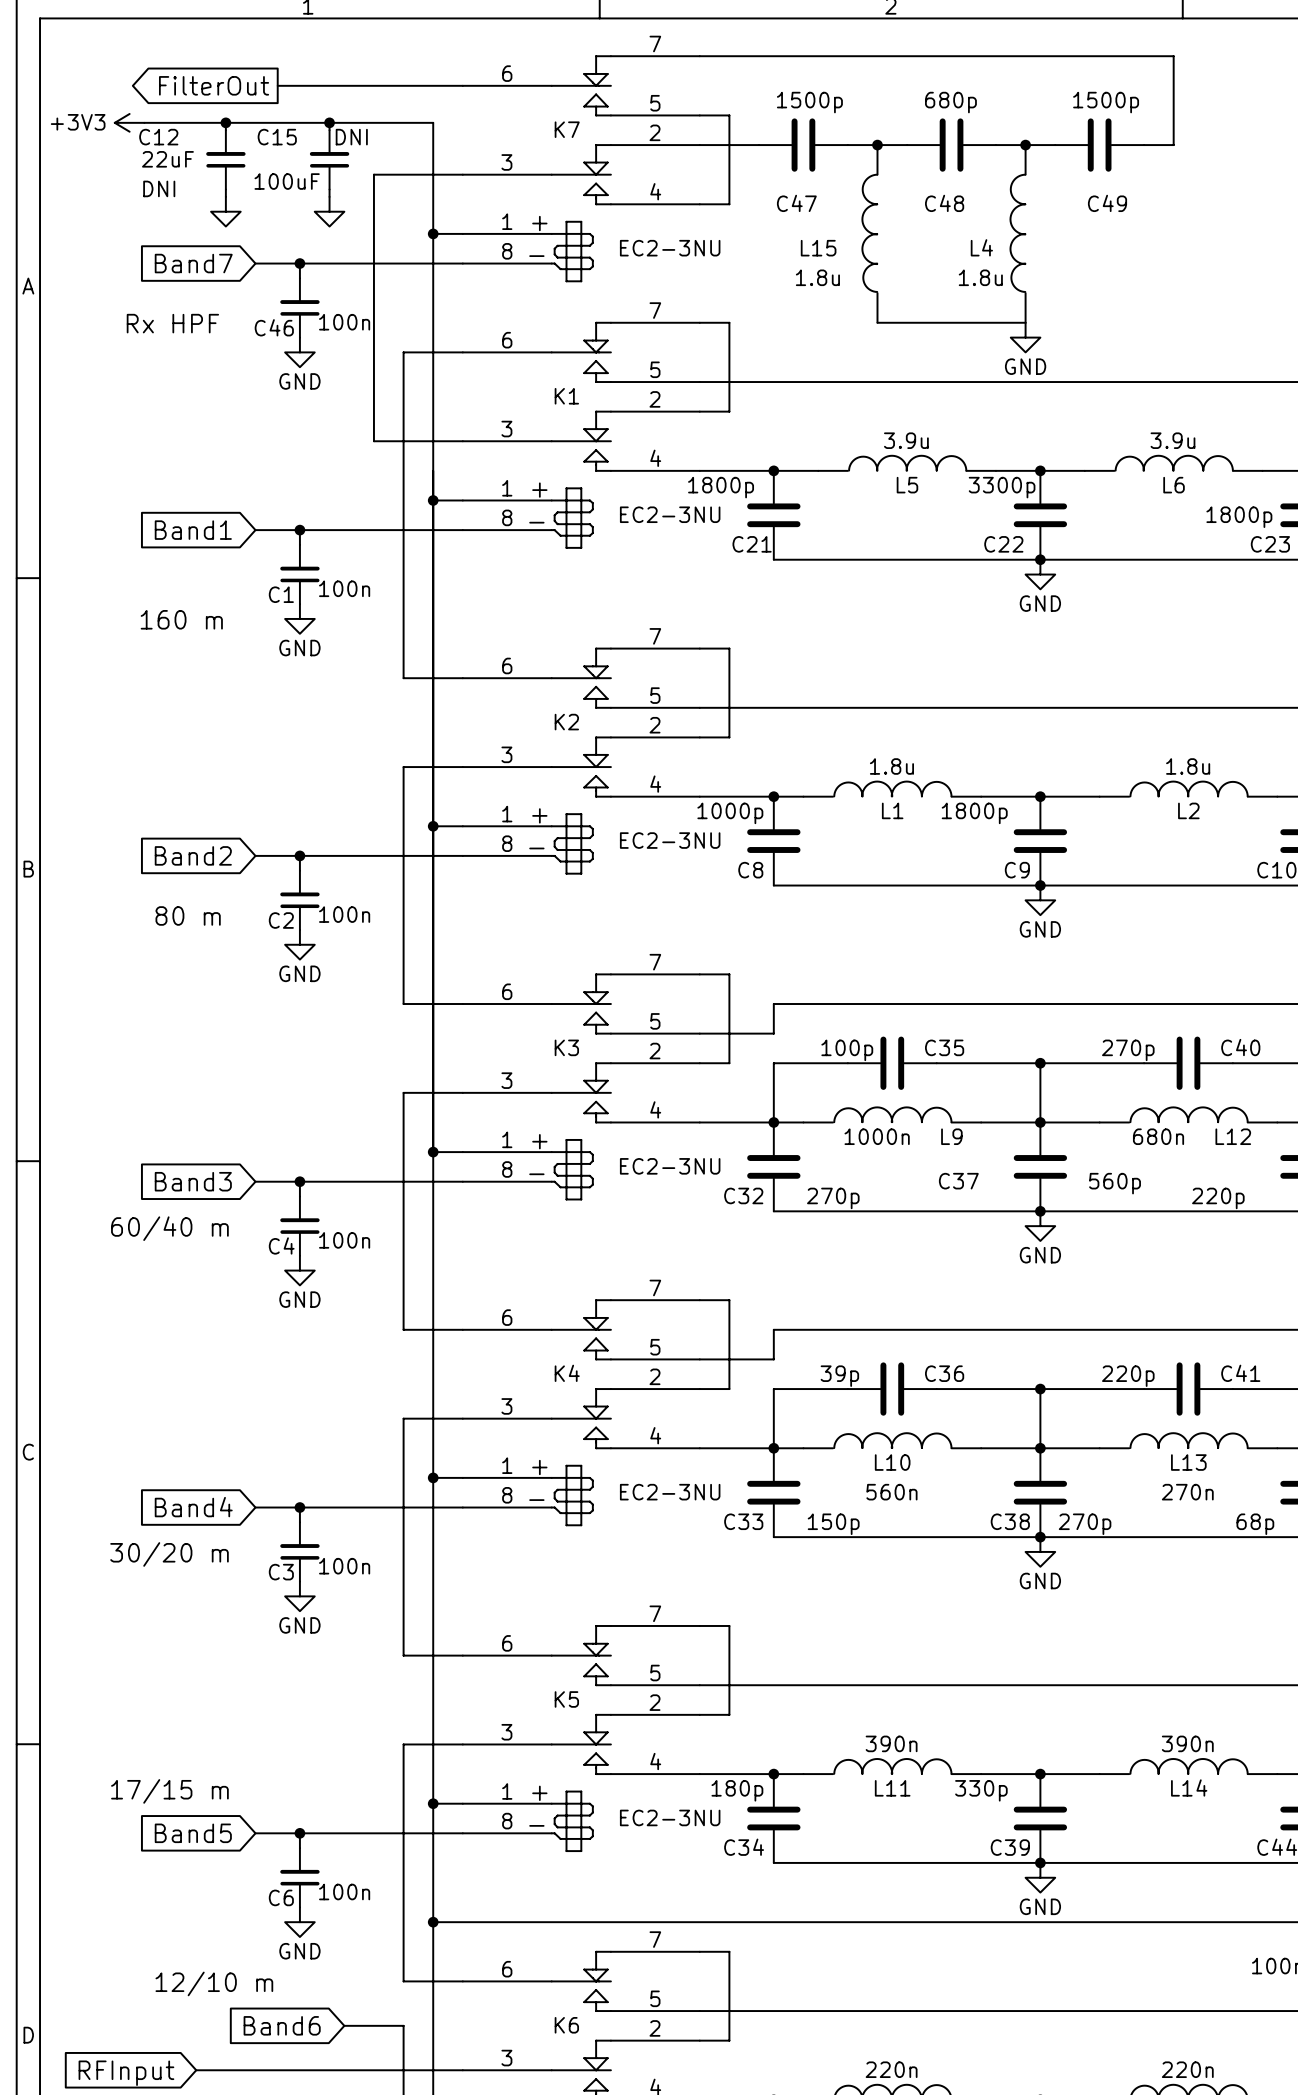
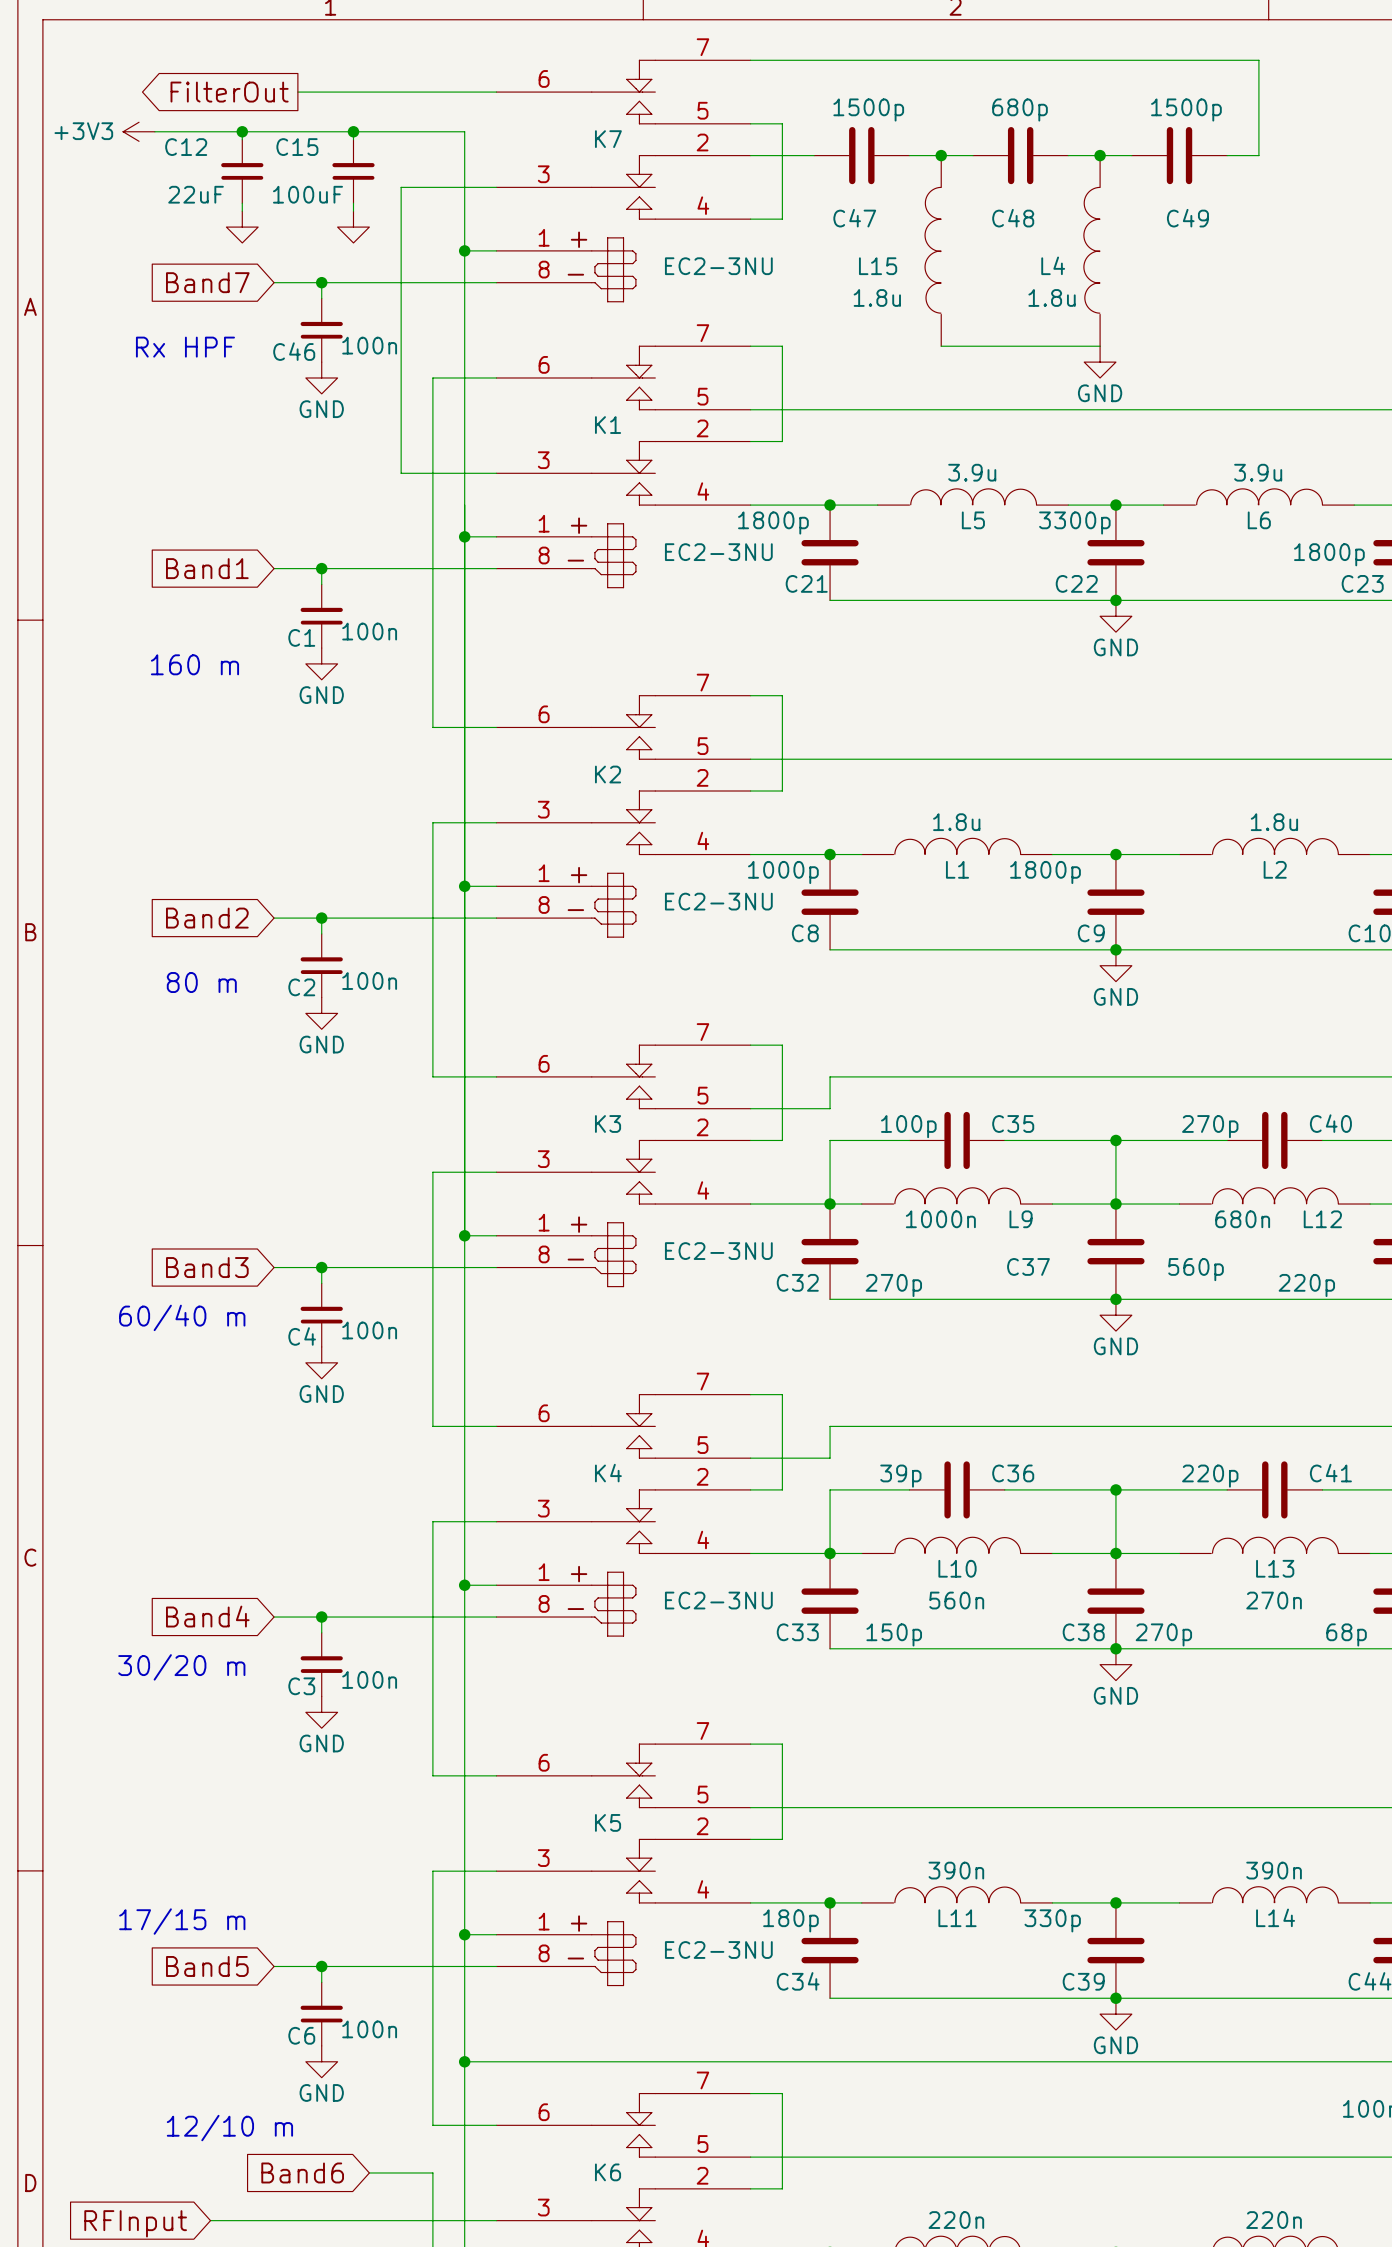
C12 name position: C12 (158, 137) -> C12 (186, 147)
C15 text: DNI (351, 137) -> none
C12 value position: 22uF (167, 159) -> 22uF (196, 194)
C12 text: DNI (159, 188) -> none

